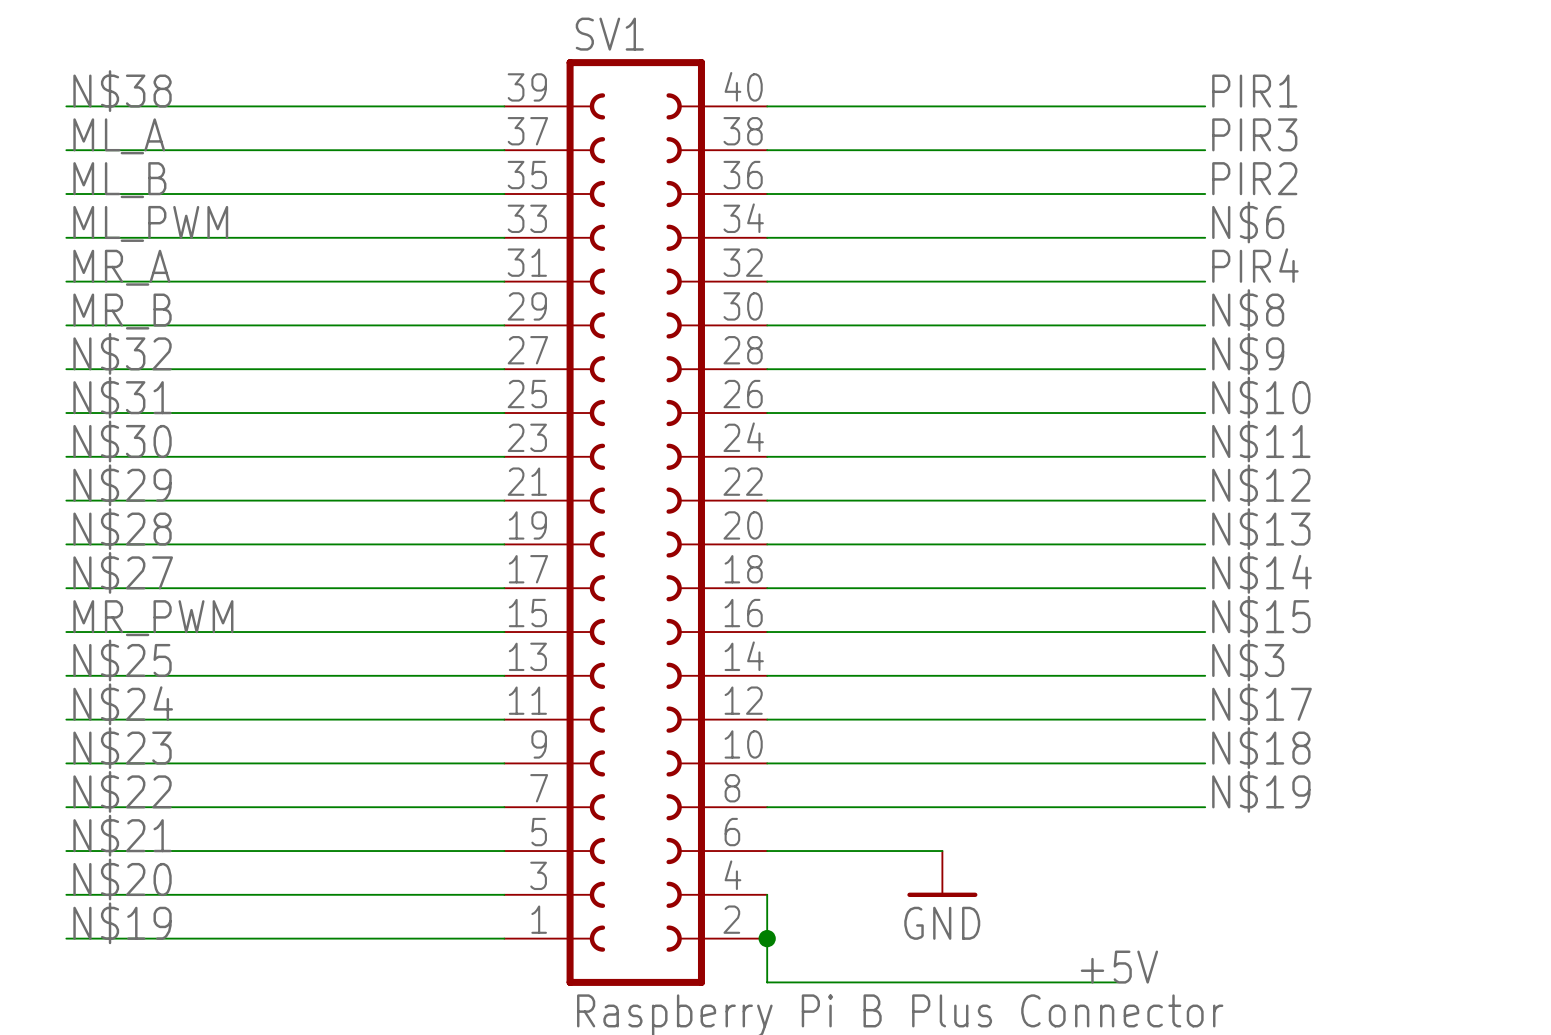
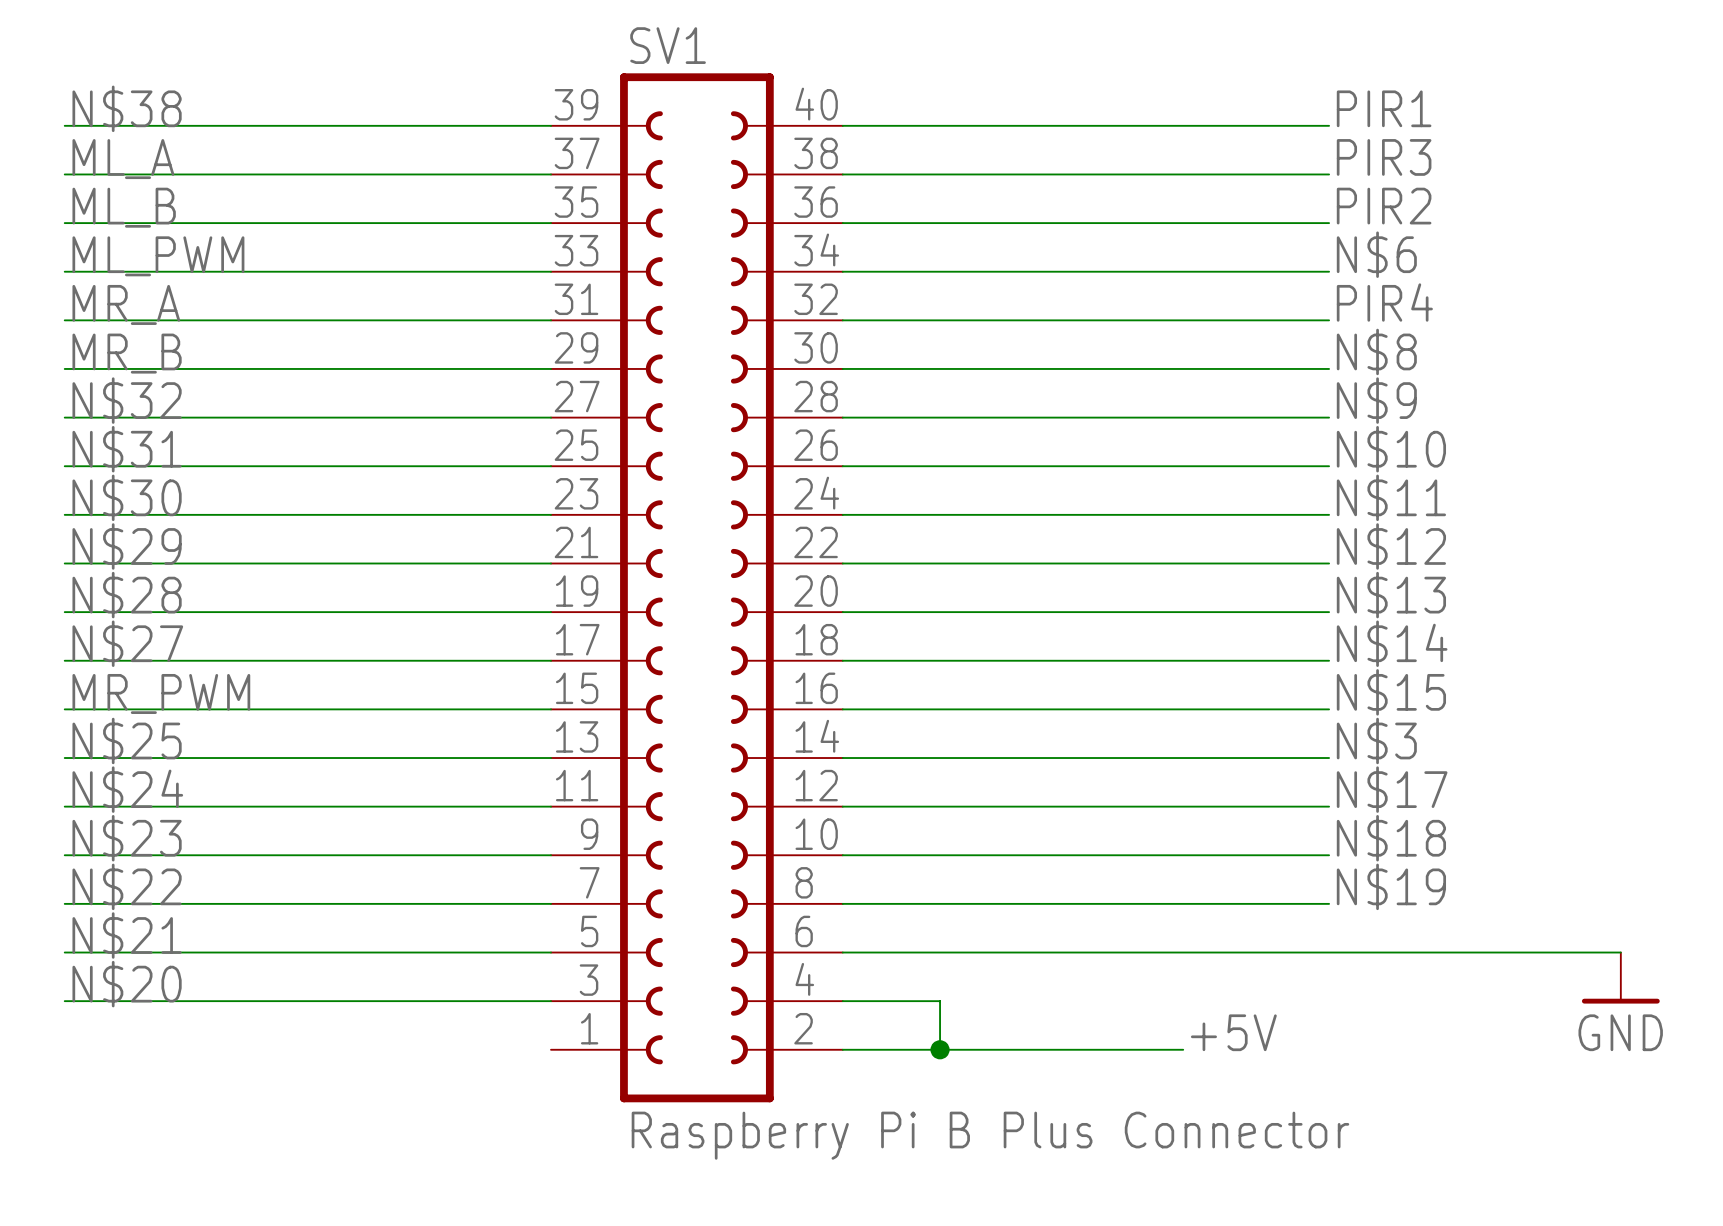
wire: none -> (1037, 952) (1620, 952)
power symbol: GND (942, 874) -> none
power symbol: none -> GND (1620, 978)
wire: (767, 894) (767, 982) (1117, 982) -> (842, 1001) (940, 1001) (940, 1049)
label: N$19 (122, 923) -> none
wire: (66, 938) (504, 938) -> none
wire: none -> (842, 1049) (1183, 1049)
junction position: (767, 938) -> (940, 1049)
label position: +5V (1119, 967) -> +5V (1233, 1032)

